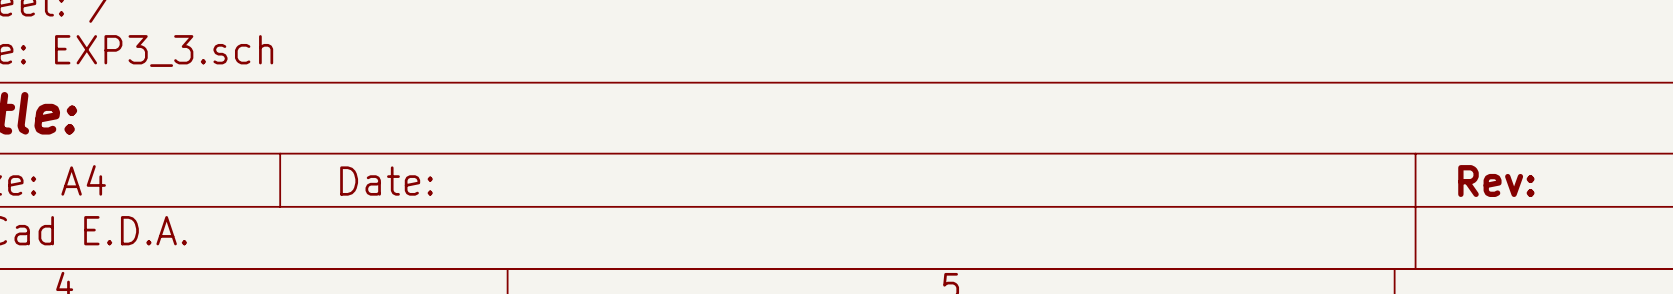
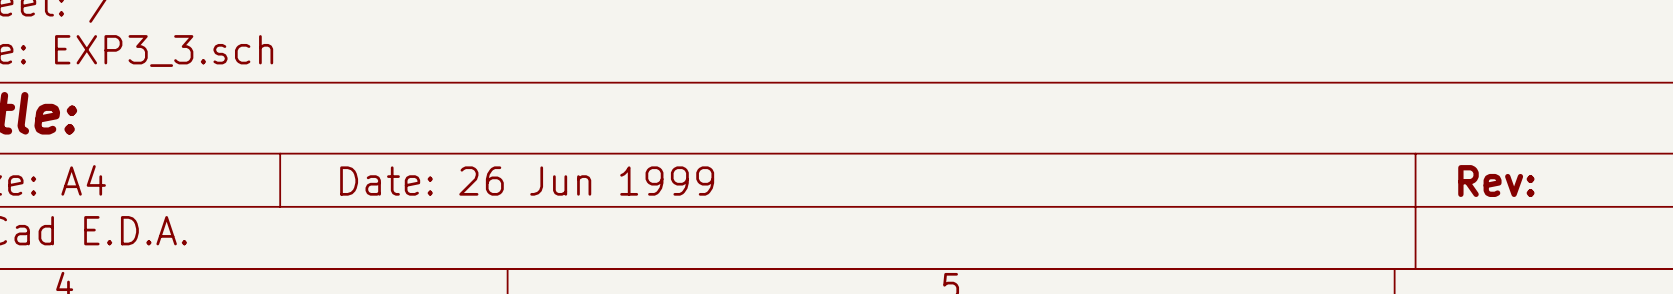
title block: Date: (386, 181) -> Date: 26 Jun 1999 (527, 181)

